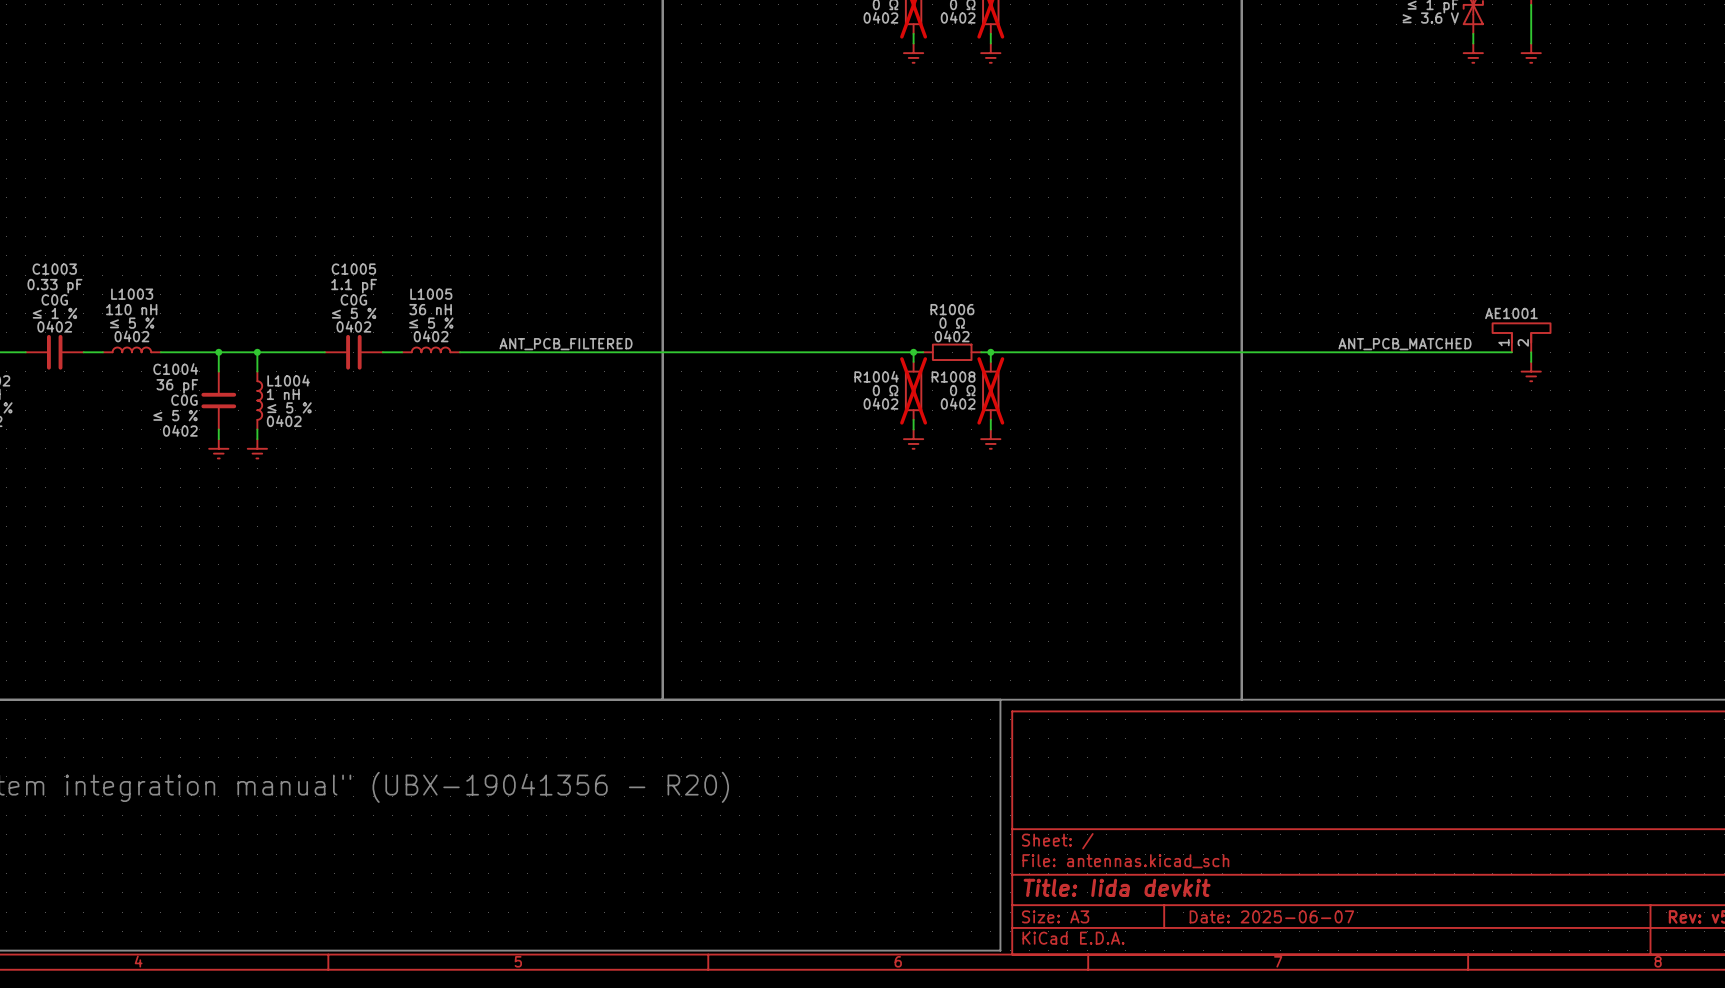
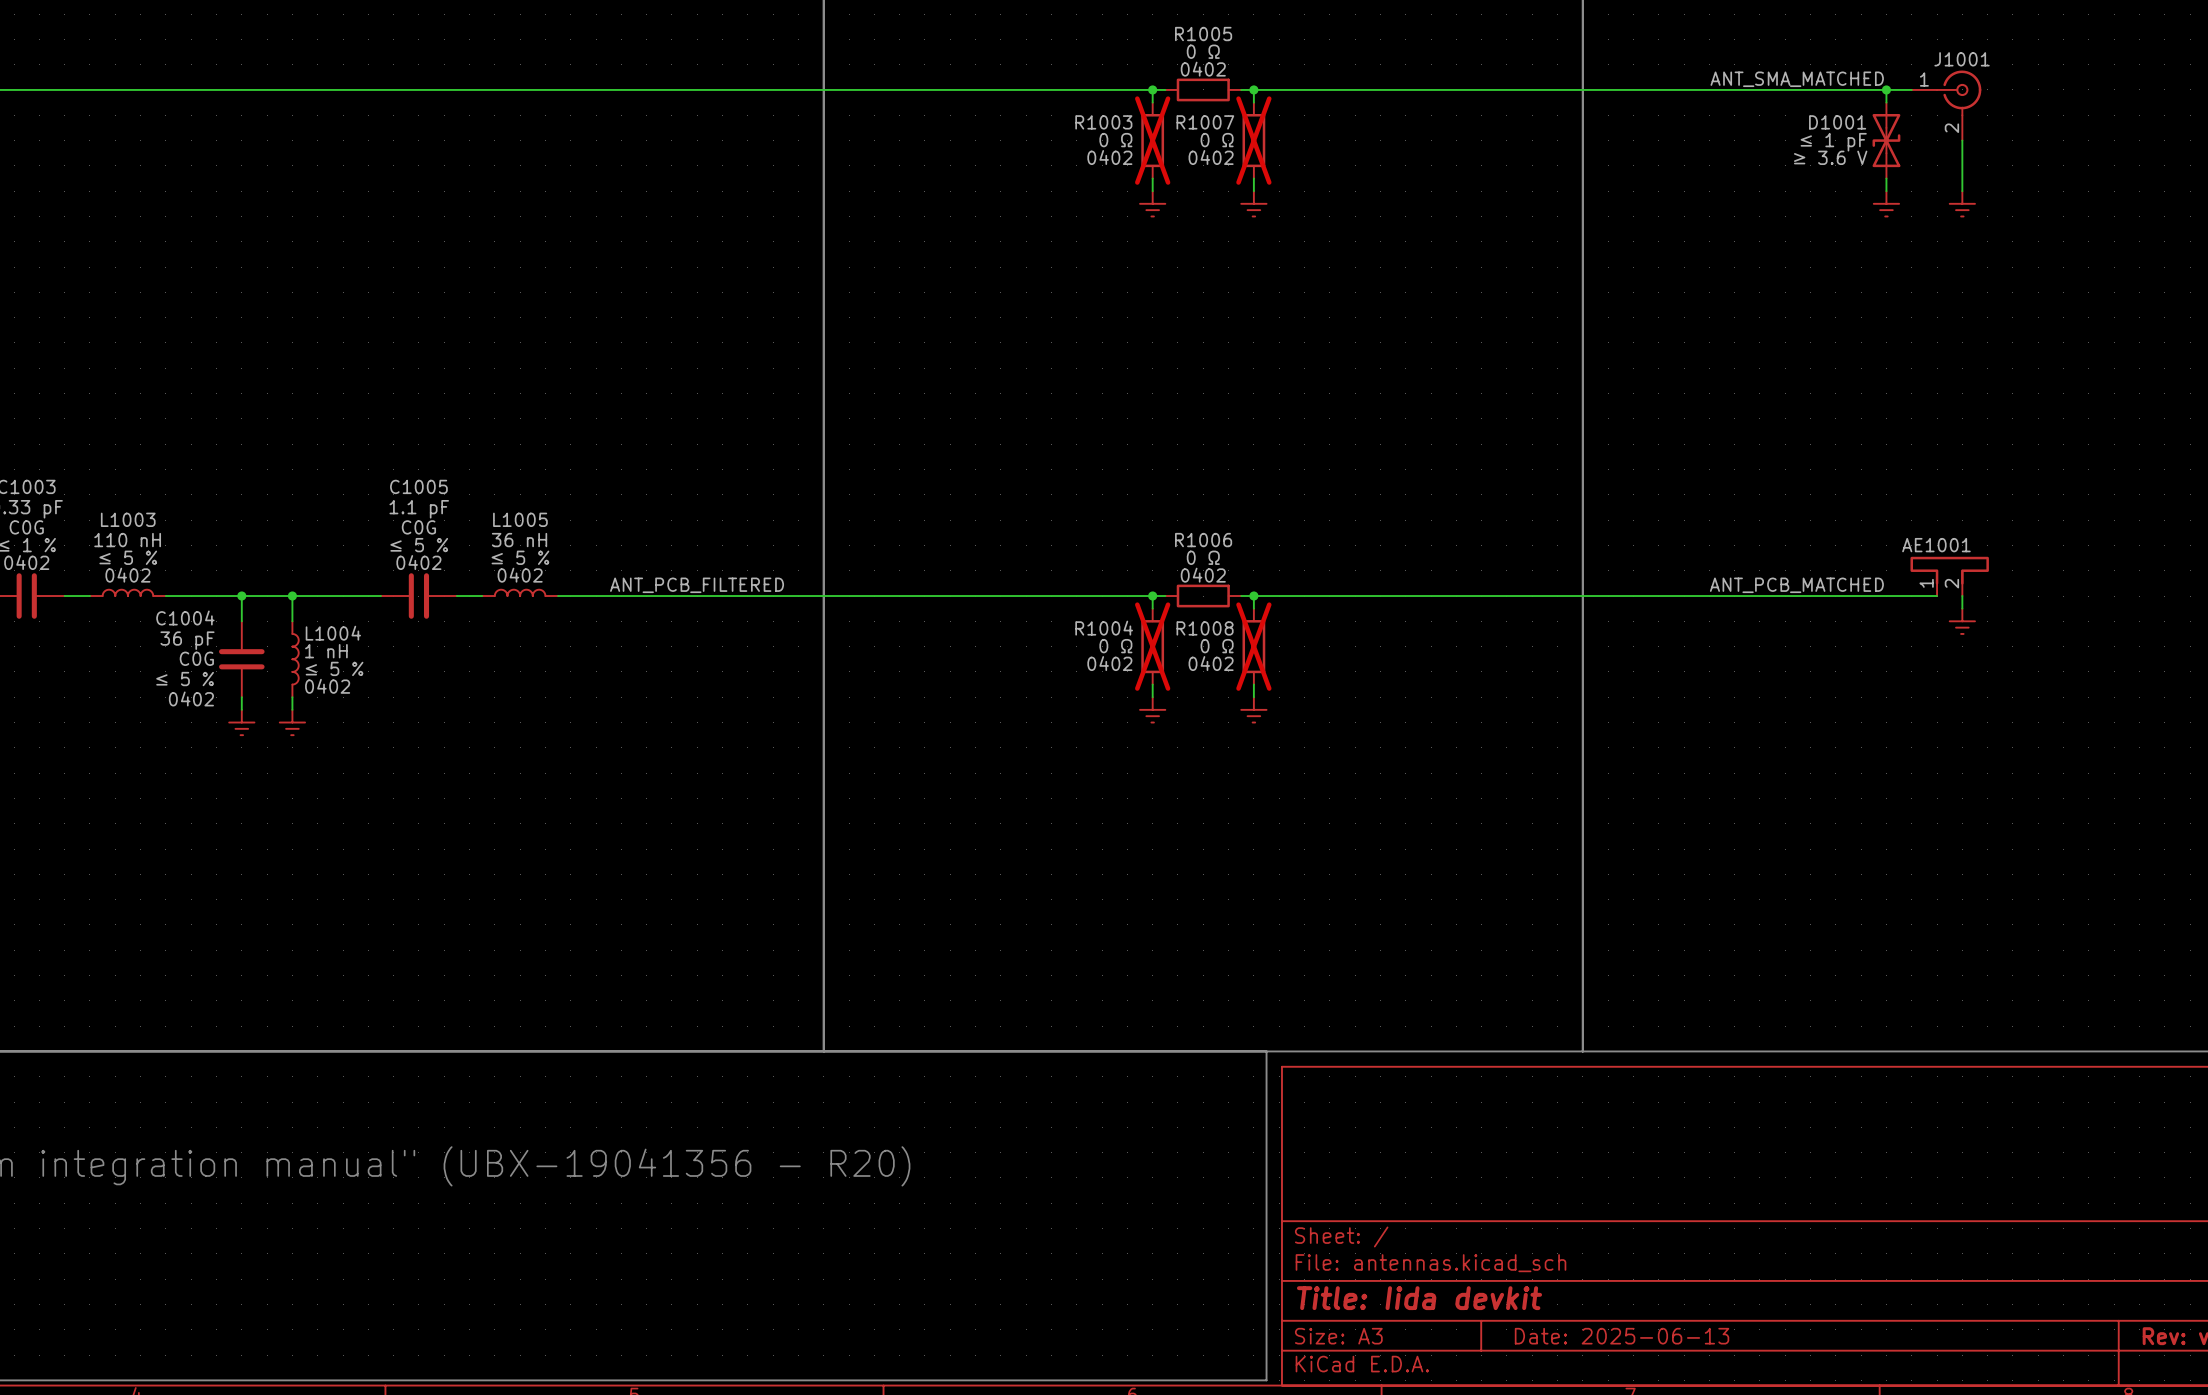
title block: Date: 2025-06-07 (1271, 916) -> Date: 2025-06-13 (1622, 1336)

